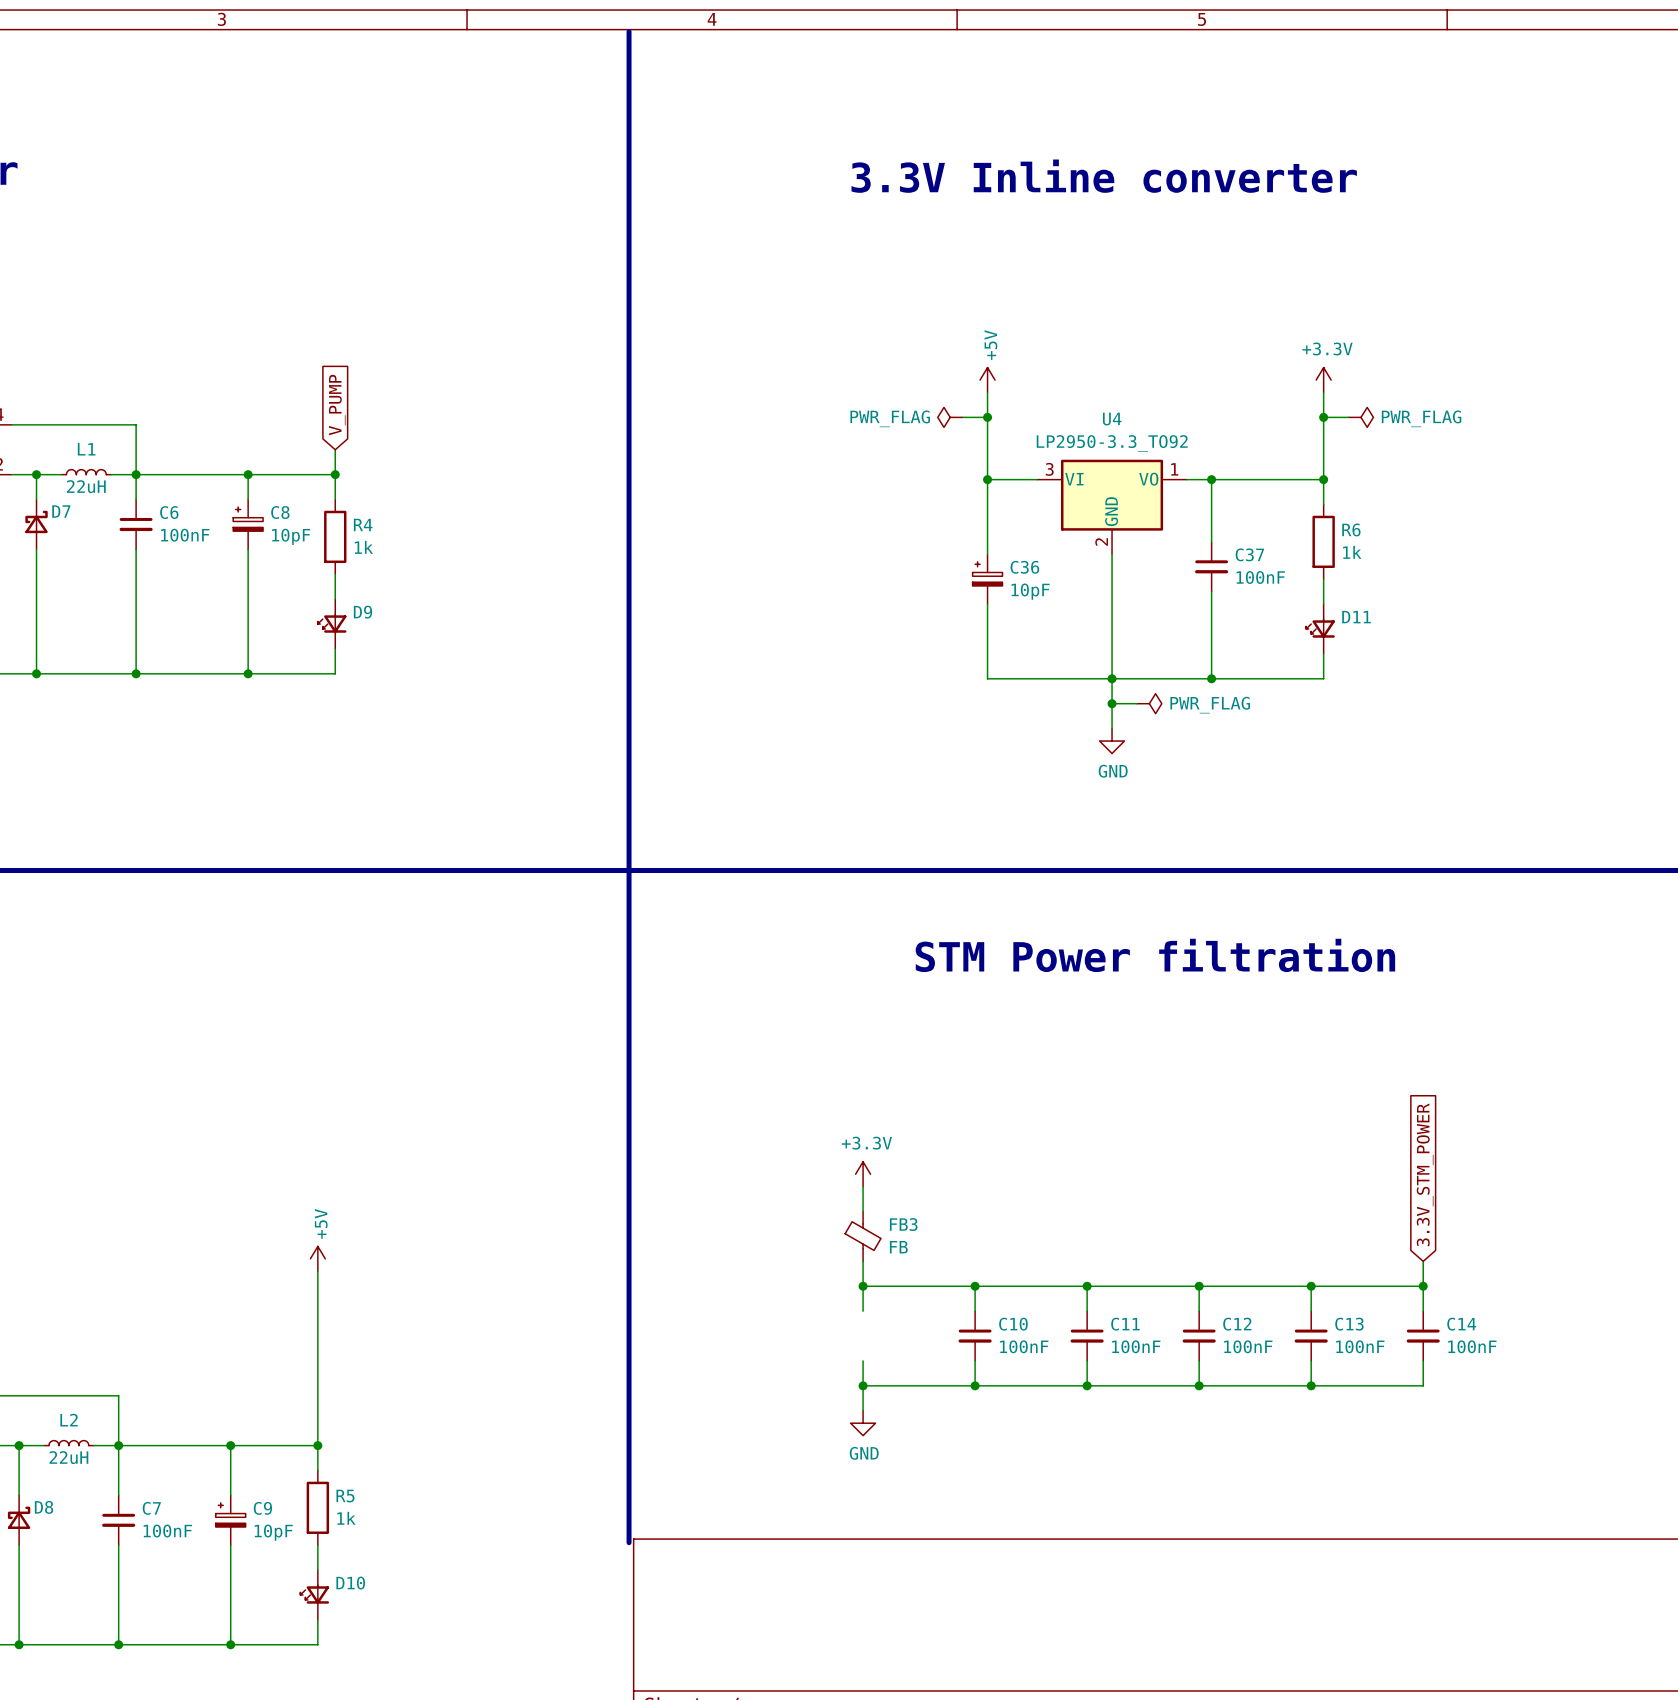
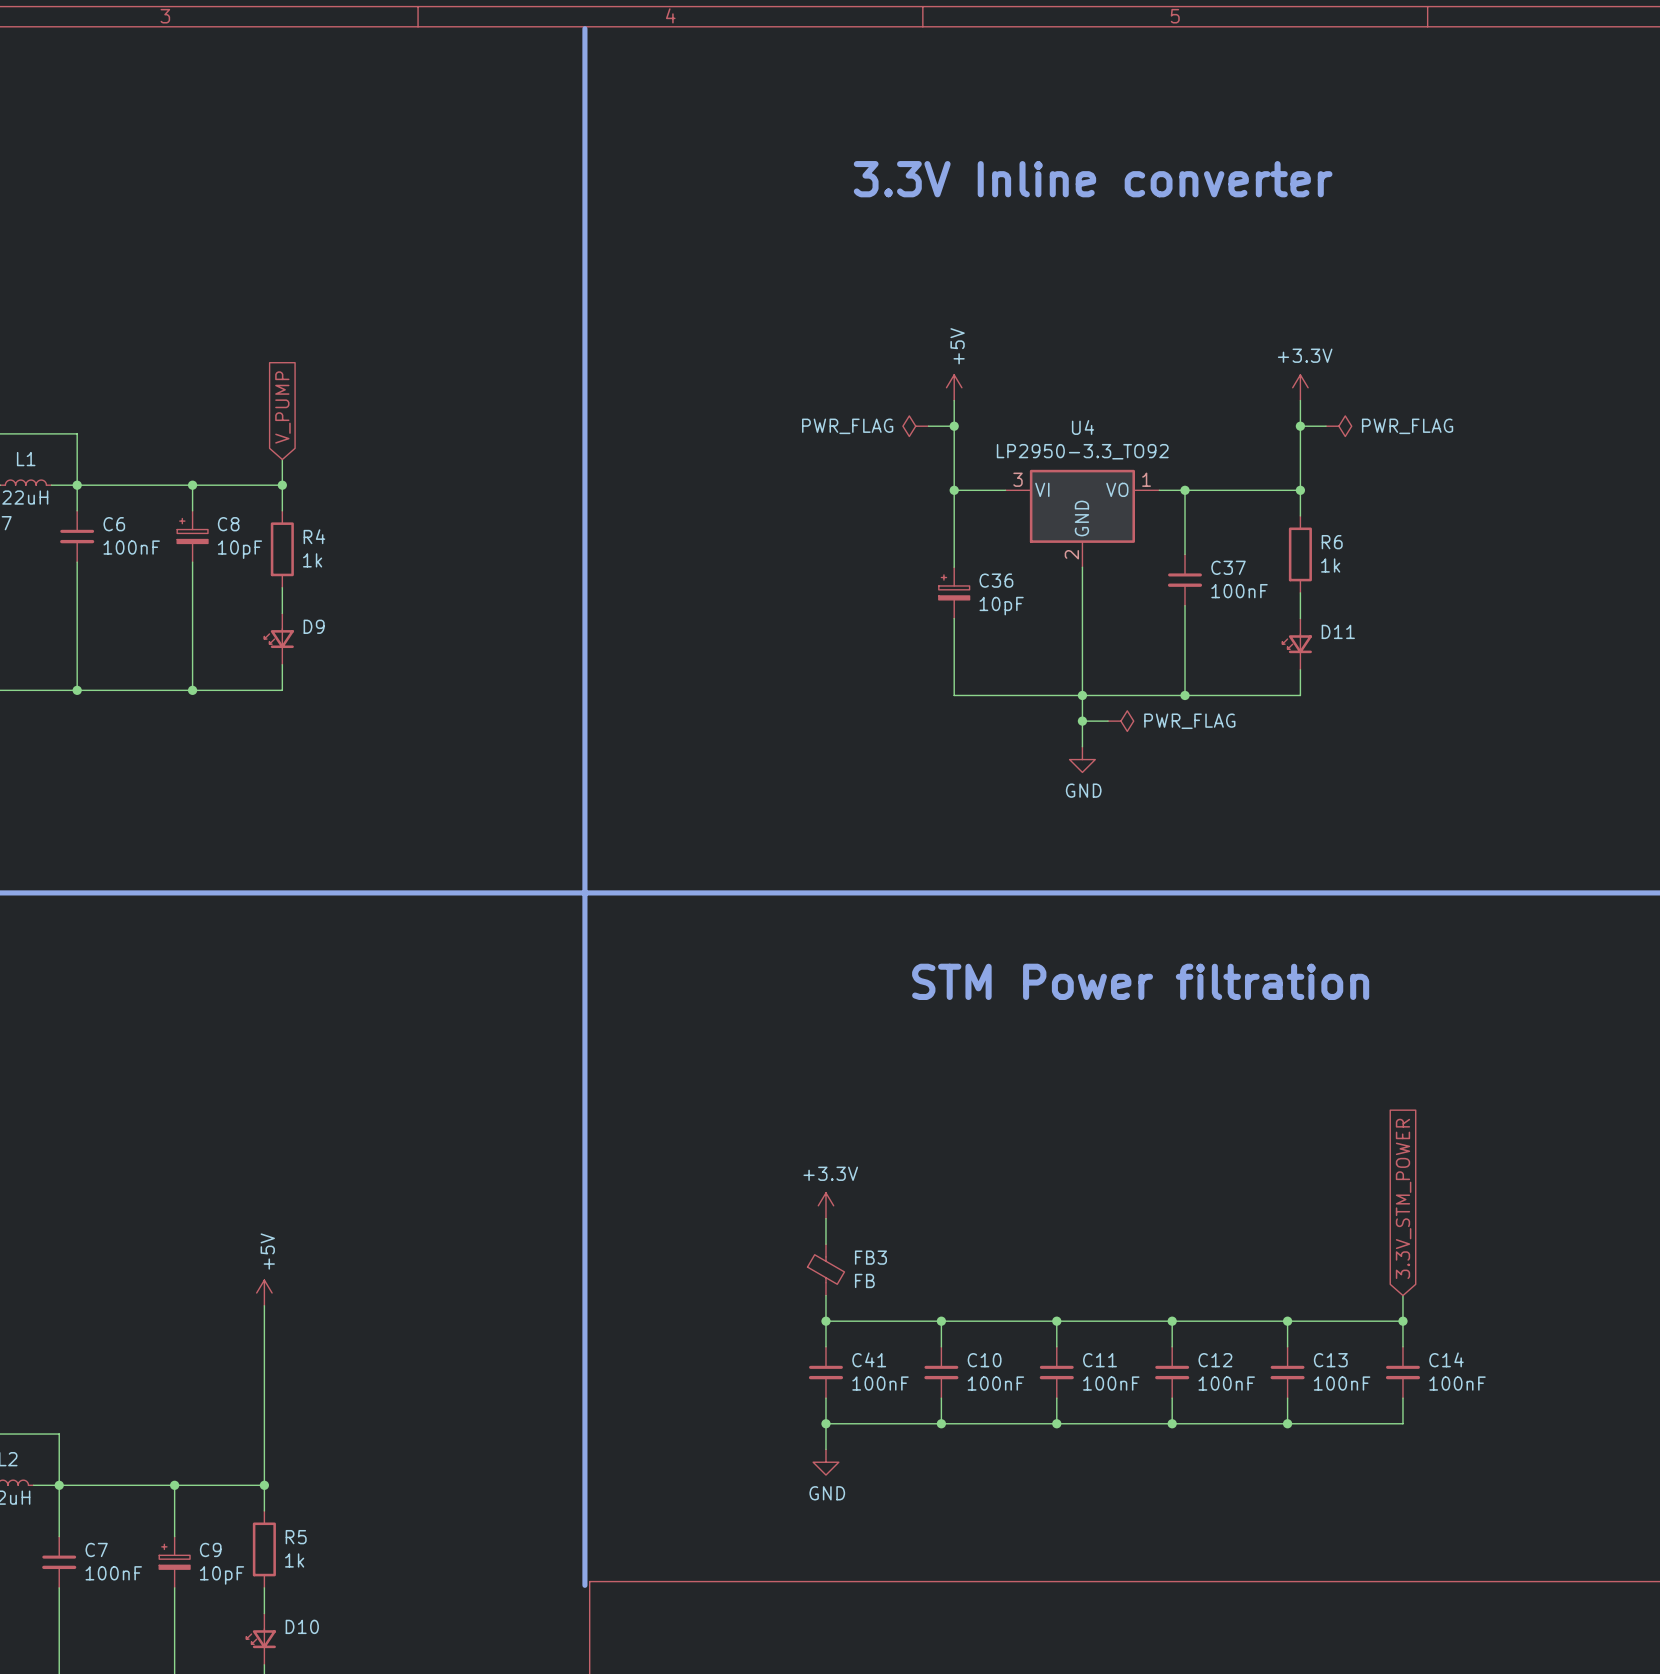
C41: none -> 100nF (825, 1372)

